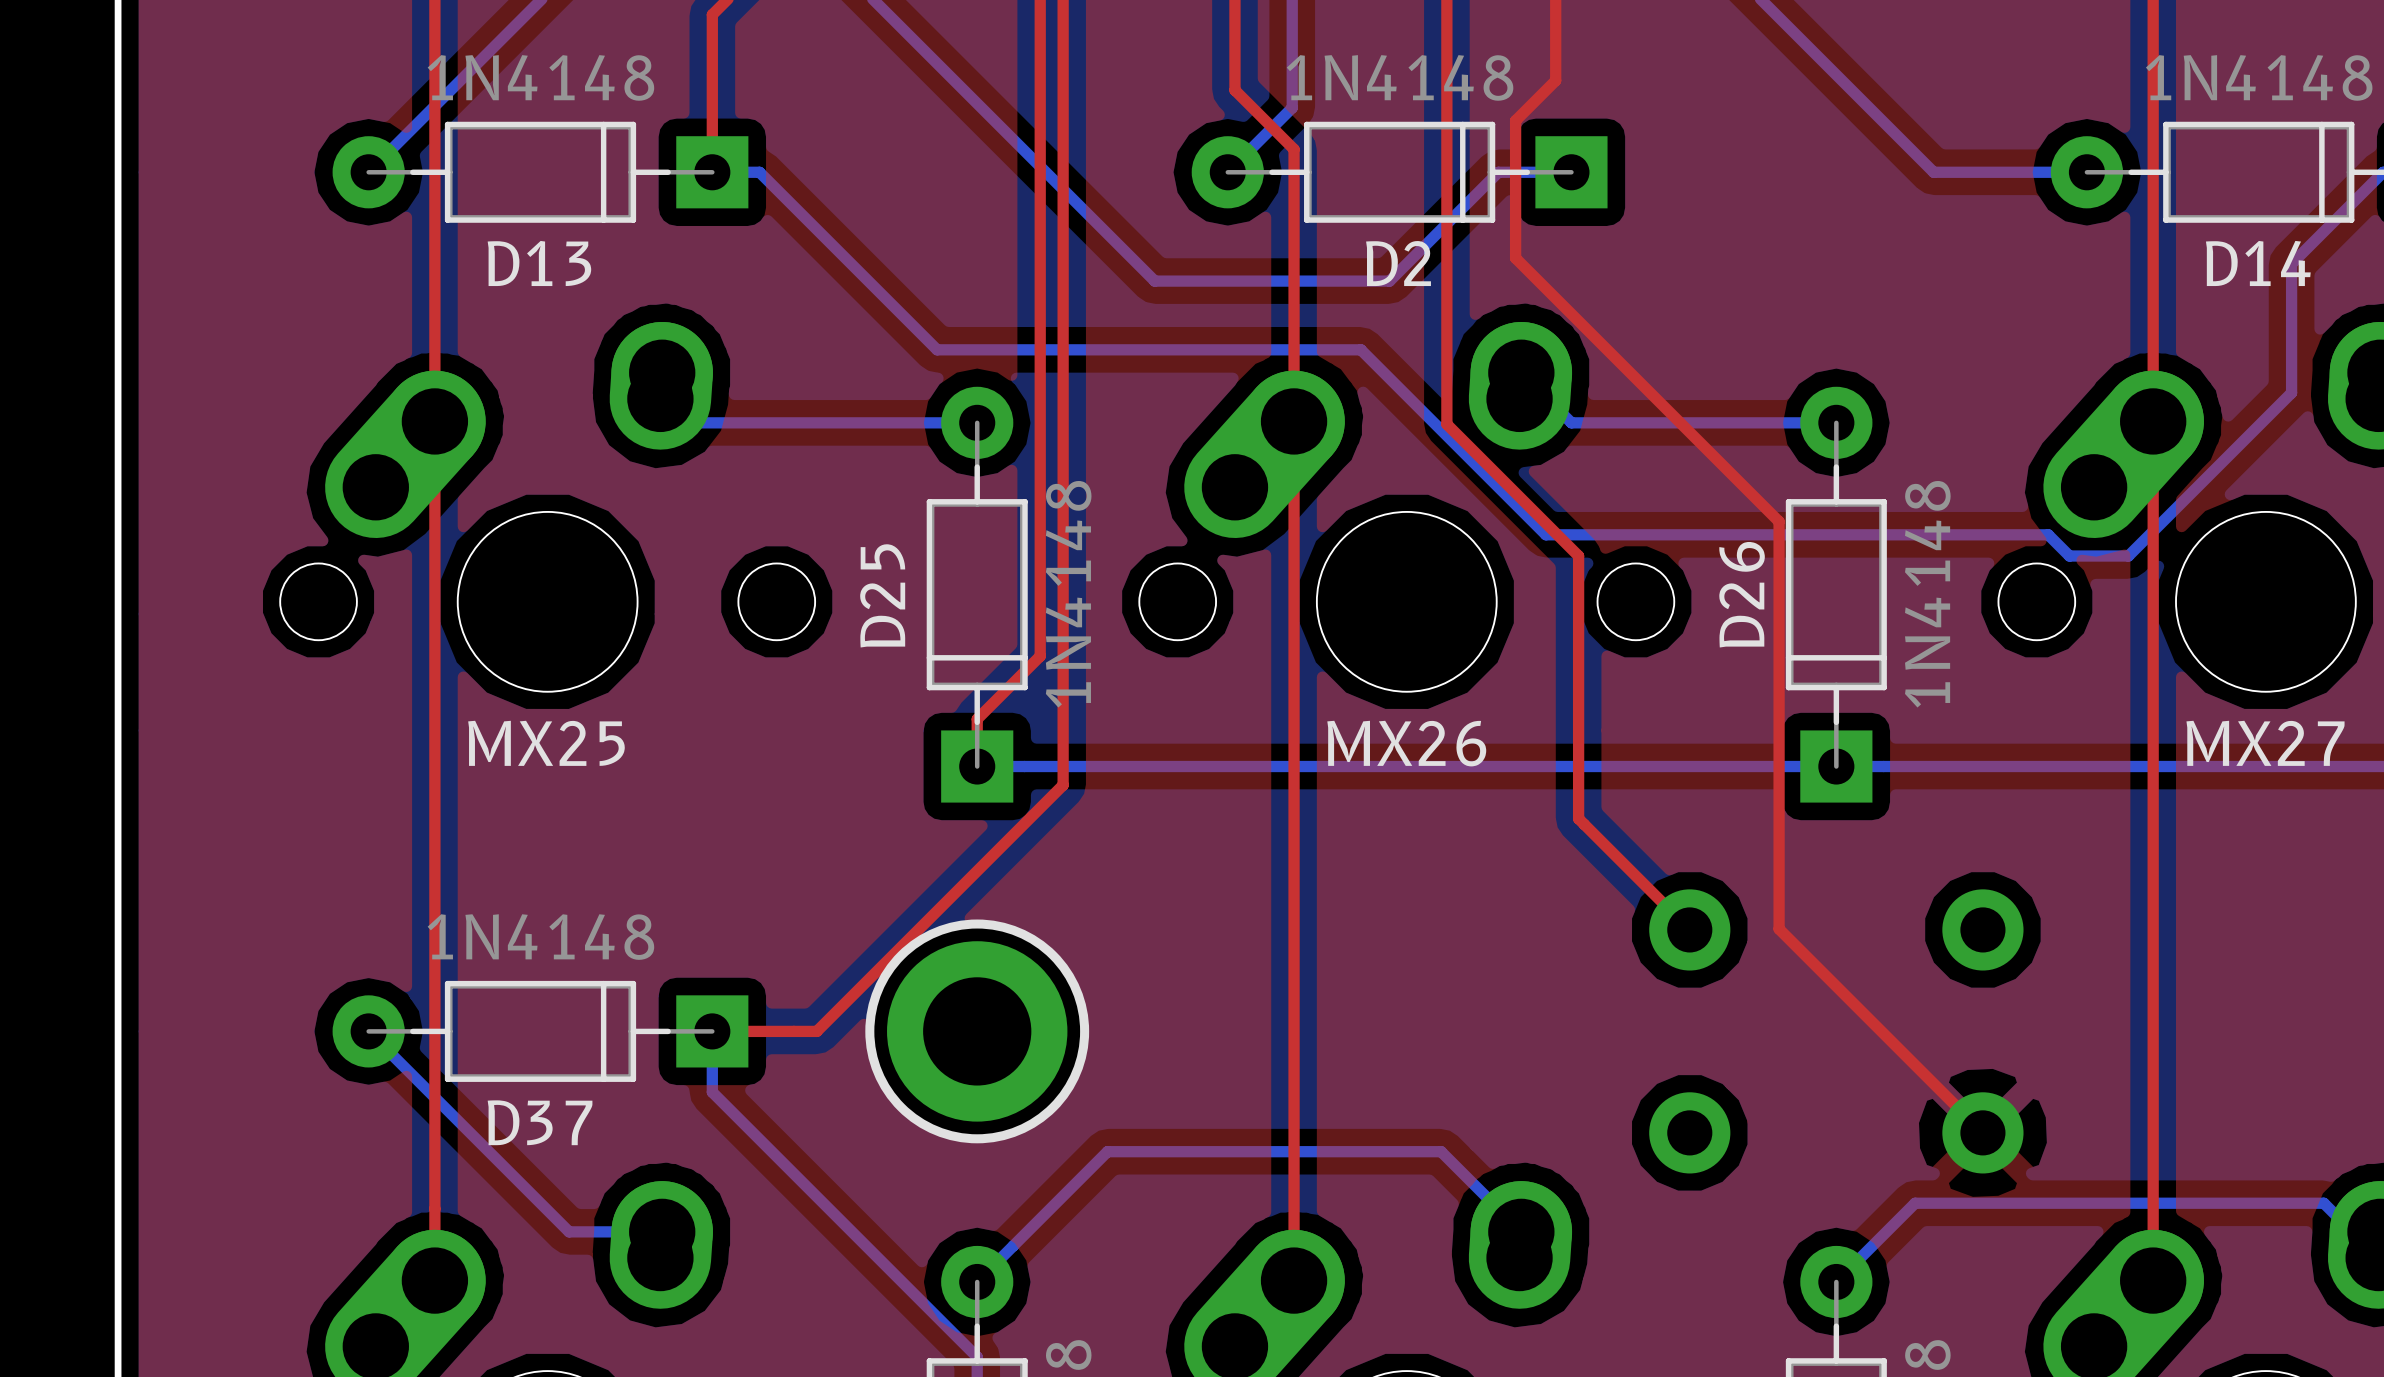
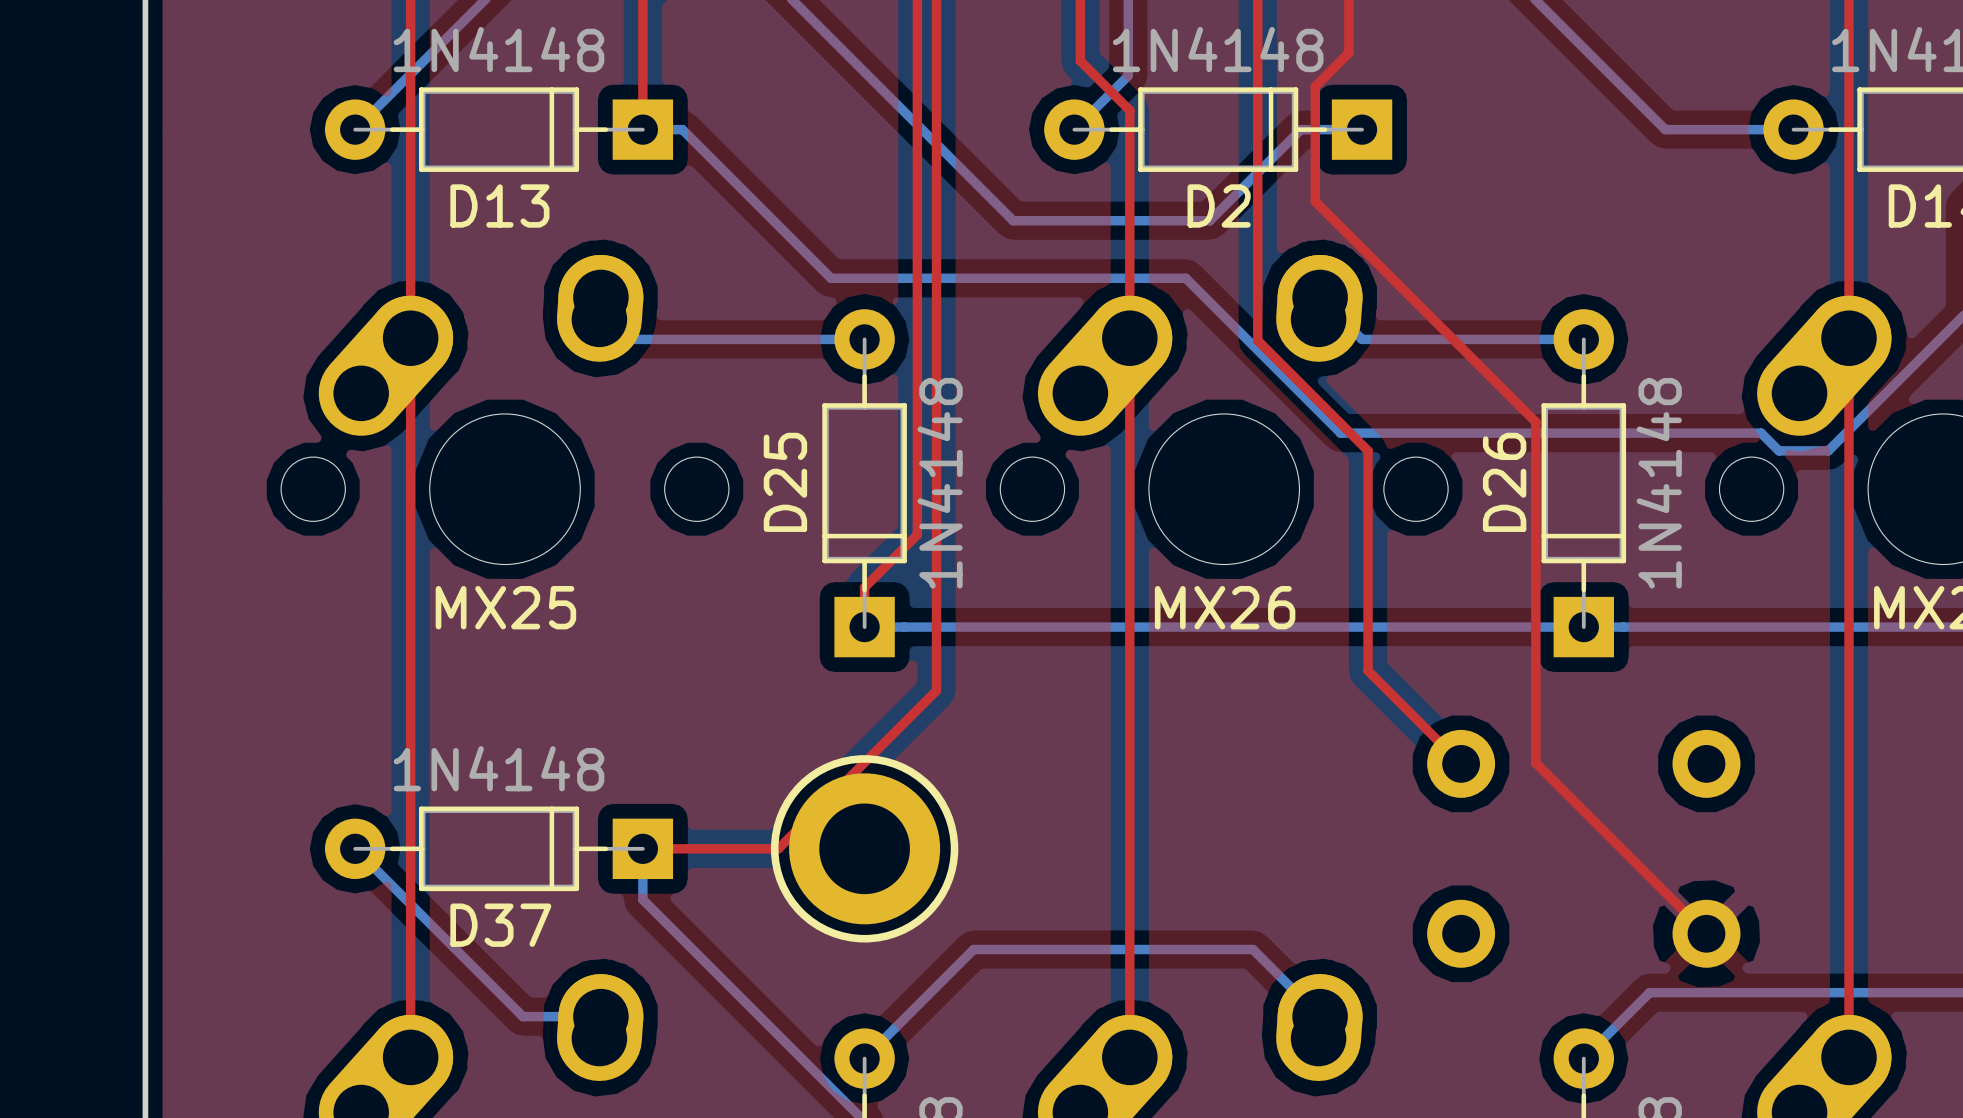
top track: (1063, 785) (816, 1031) -> (936, 642) (936, 690) (778, 848) (730, 848)

